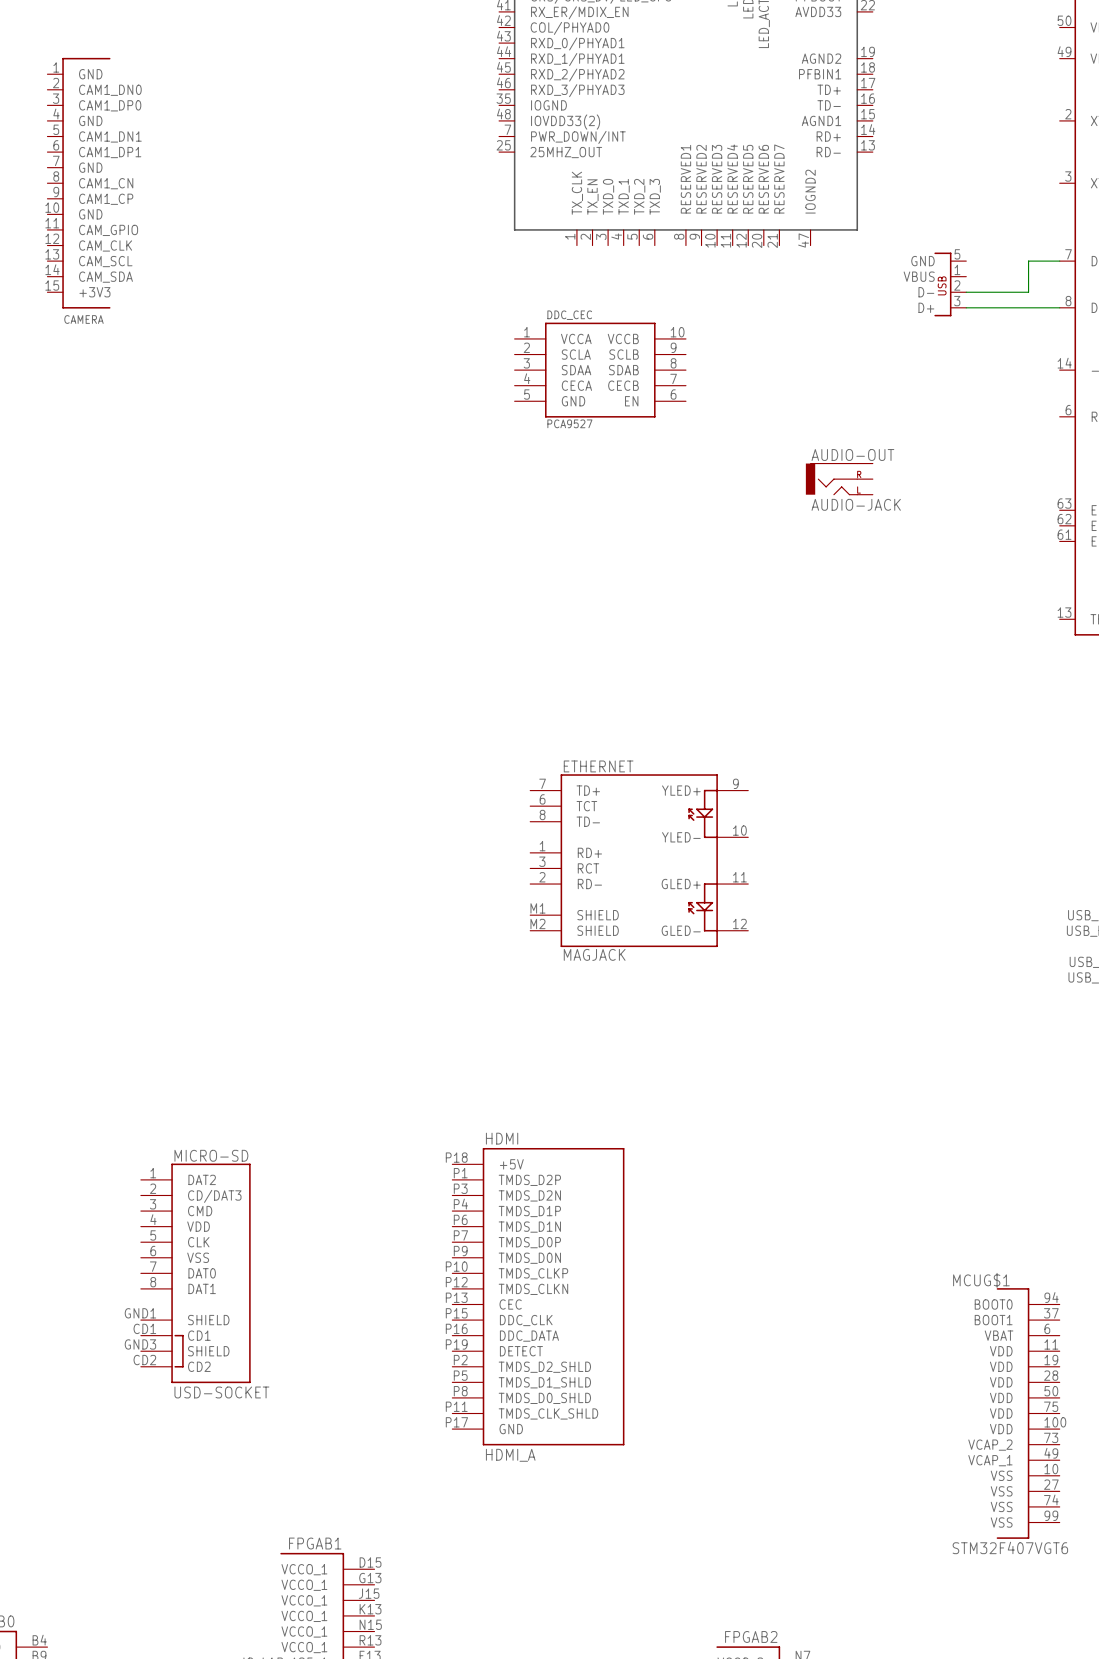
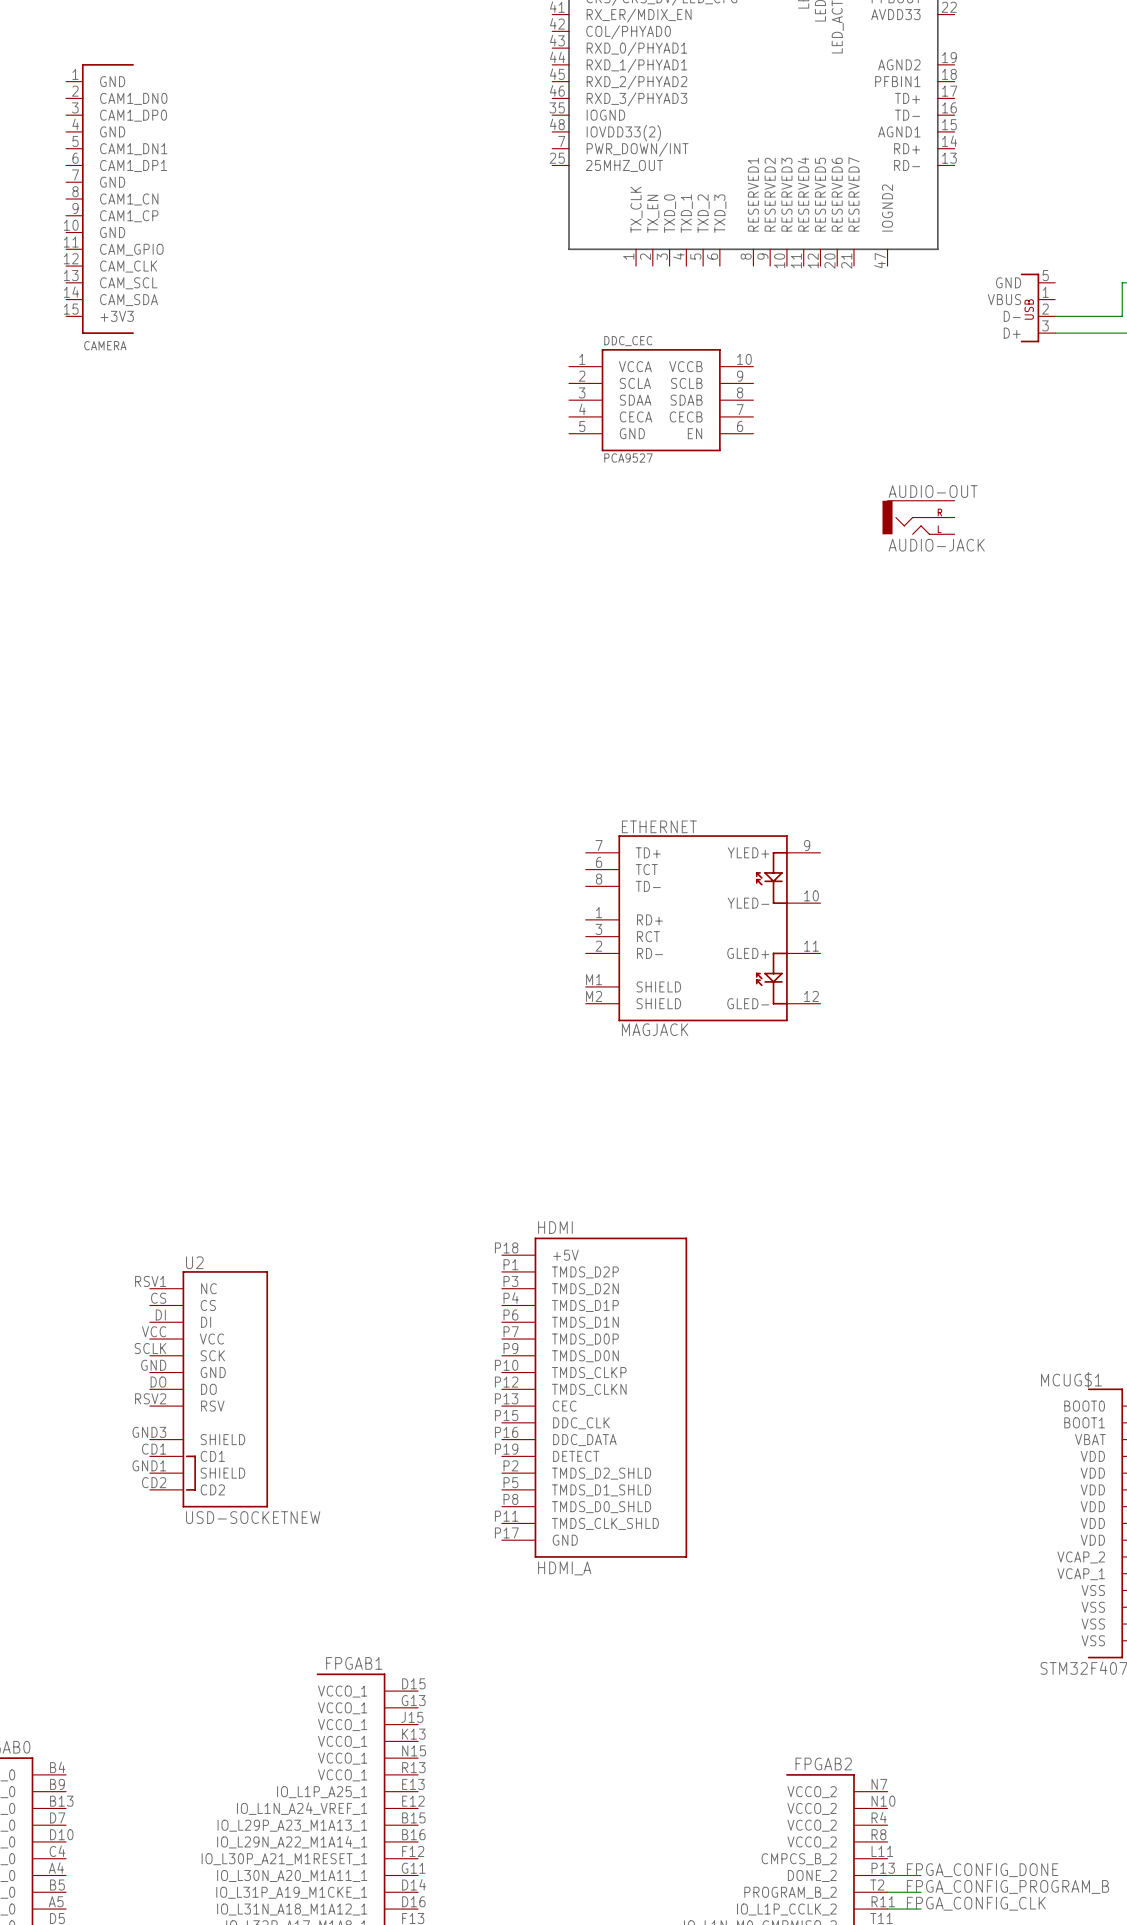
MICRO-SD: USD-SOCKET (195, 1273) -> none
U2: none -> USD-SOCKETNEW (208, 1389)

